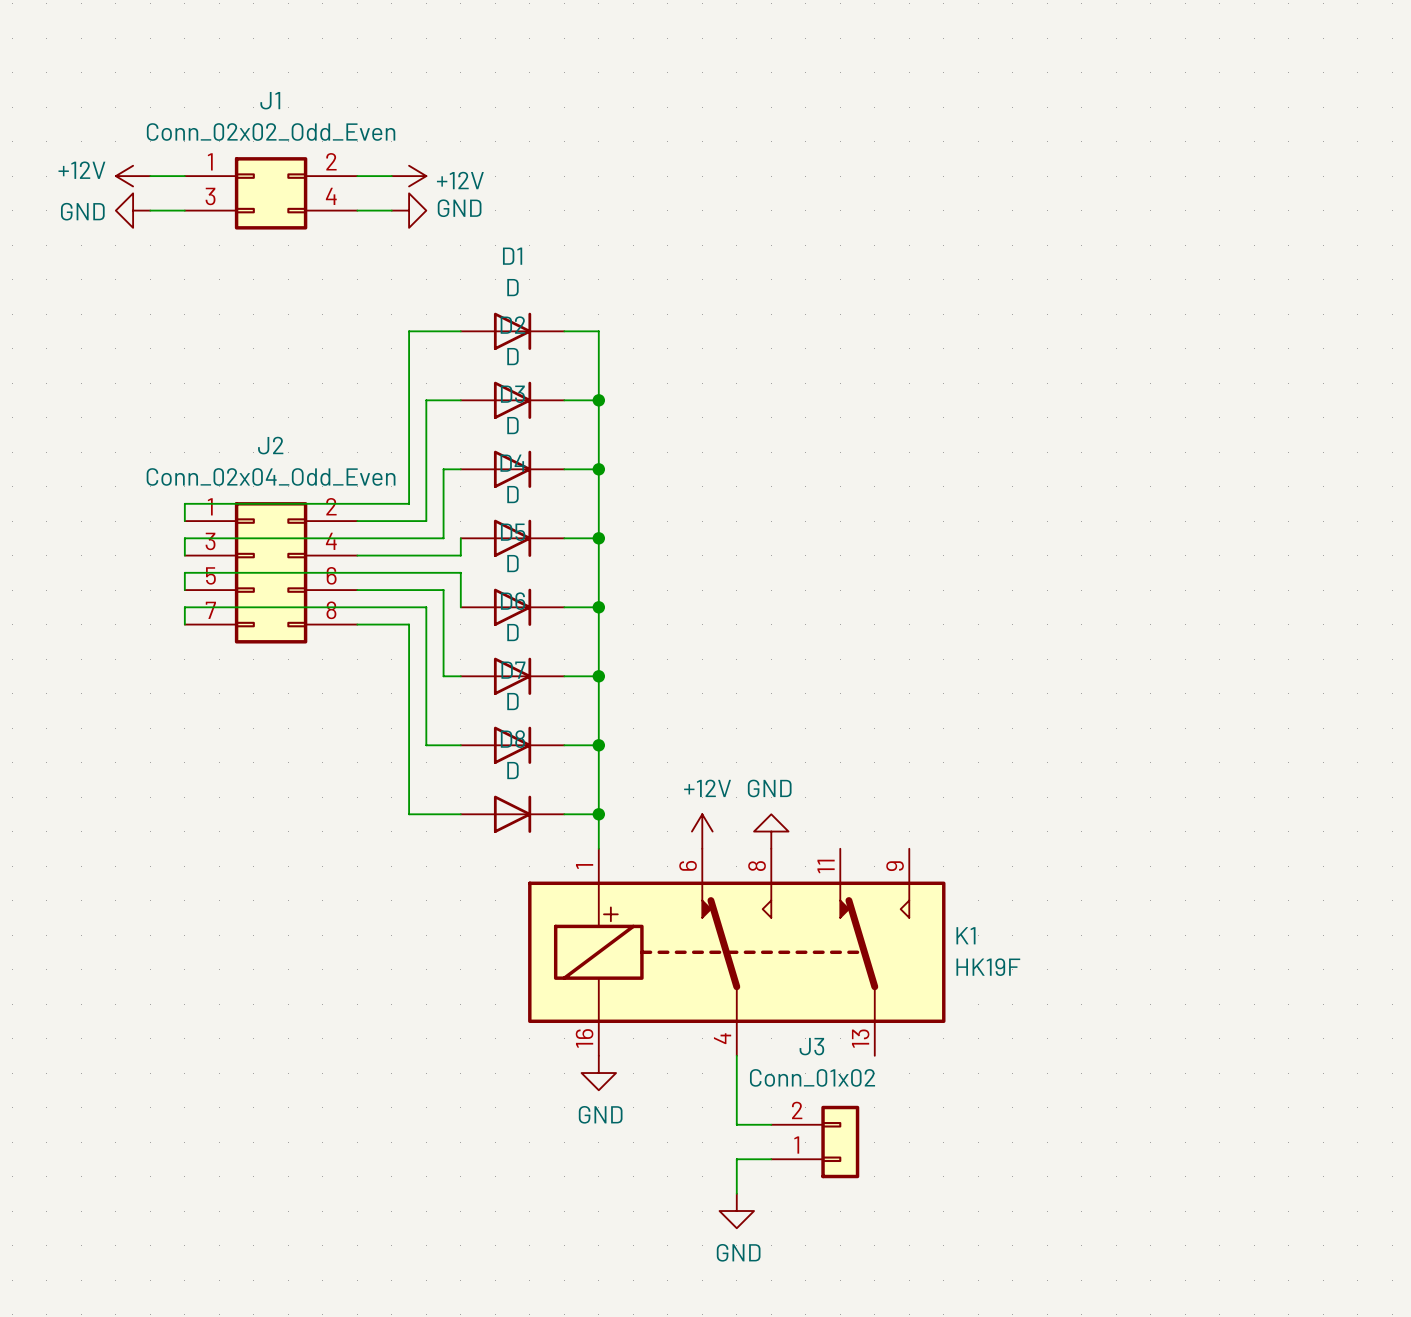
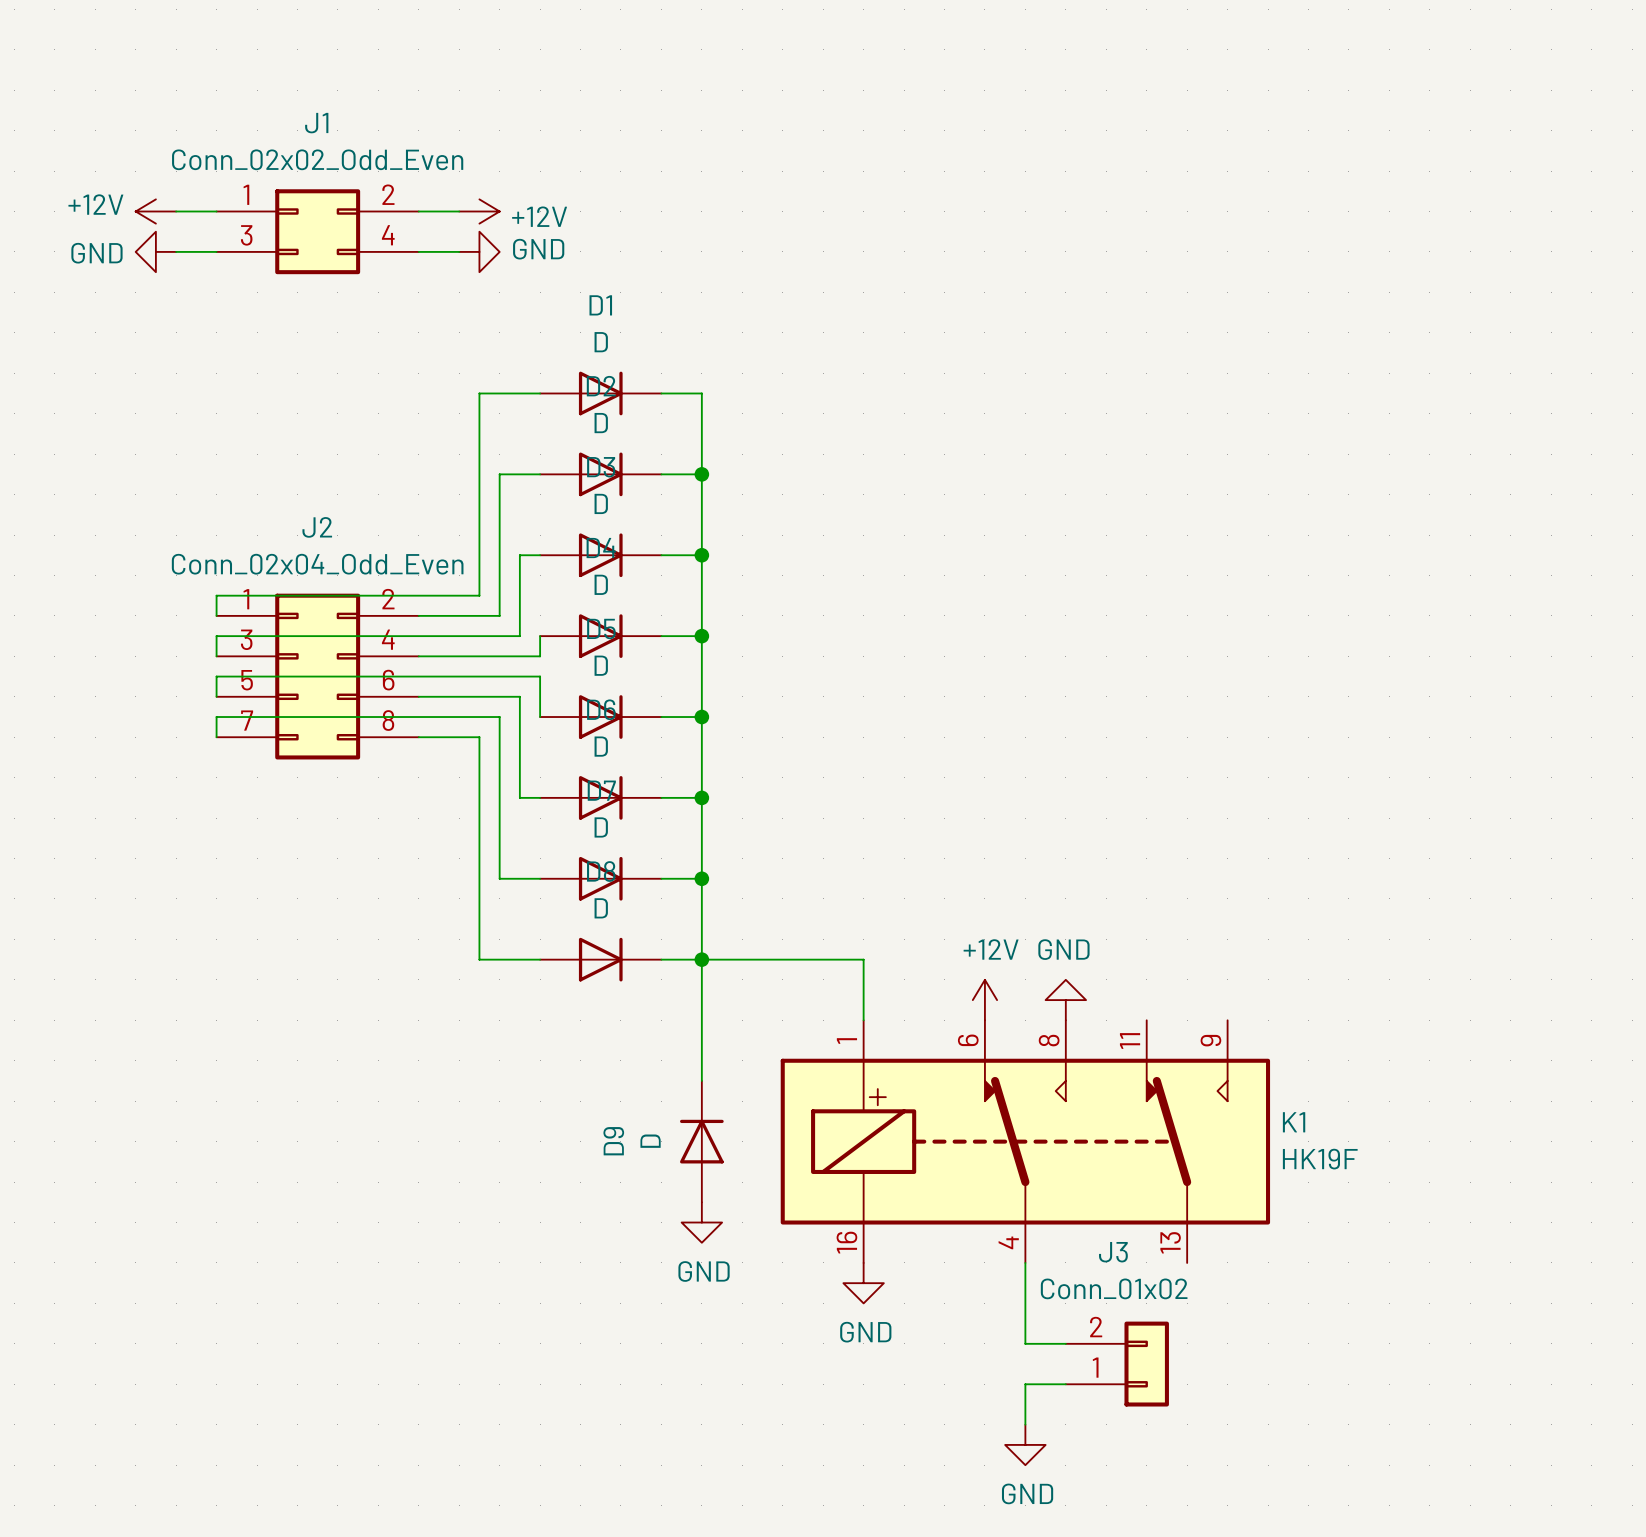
wire: none -> (701, 959) (863, 959) (863, 1020)
power symbol position: +12V (702, 831) -> +12V (984, 1000)
power symbol: GND (771, 831) -> none
power symbol: none -> GND (1065, 1000)
K1 position: (736, 952) -> (1025, 1141)
D9: none -> D (701, 1141)
wire: (736, 1055) (736, 1124) (771, 1124) -> (1025, 1262) (1025, 1343) (1065, 1343)
power symbol position: GND (598, 1073) -> GND (701, 1222)
power symbol: none -> GND (863, 1283)
J3 position: (815, 1142) -> (1117, 1364)
wire: (771, 1159) (736, 1159) (736, 1193) -> (1065, 1384) (1025, 1384) (1025, 1424)
power symbol: GND (736, 1211) -> none
power symbol: none -> GND (1025, 1444)

